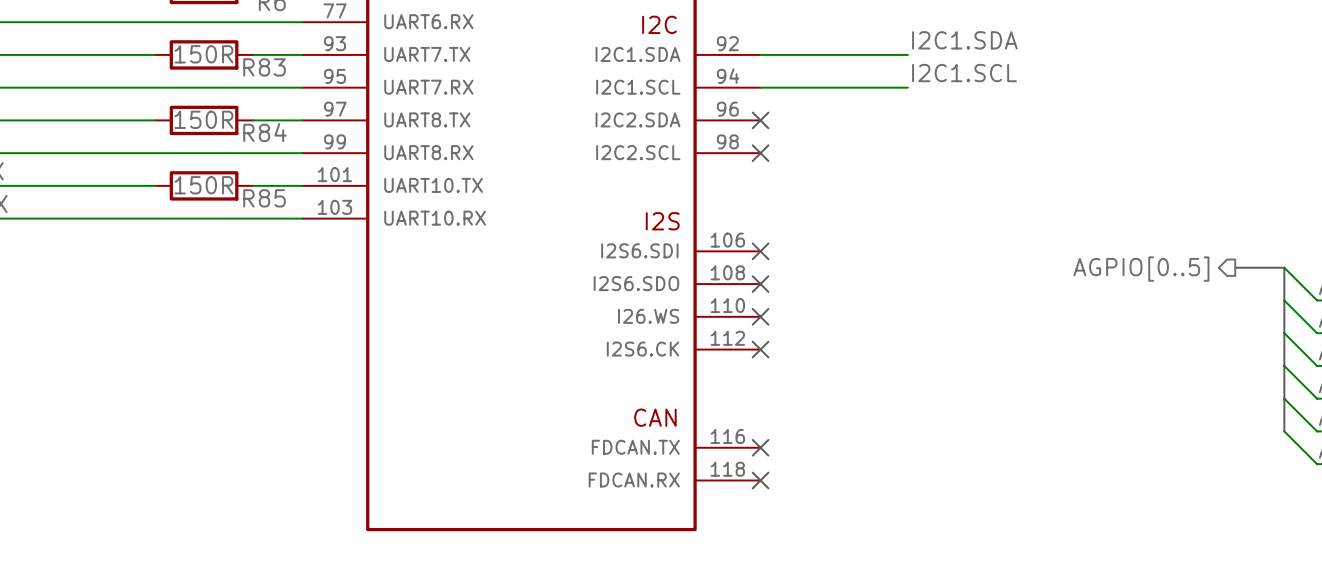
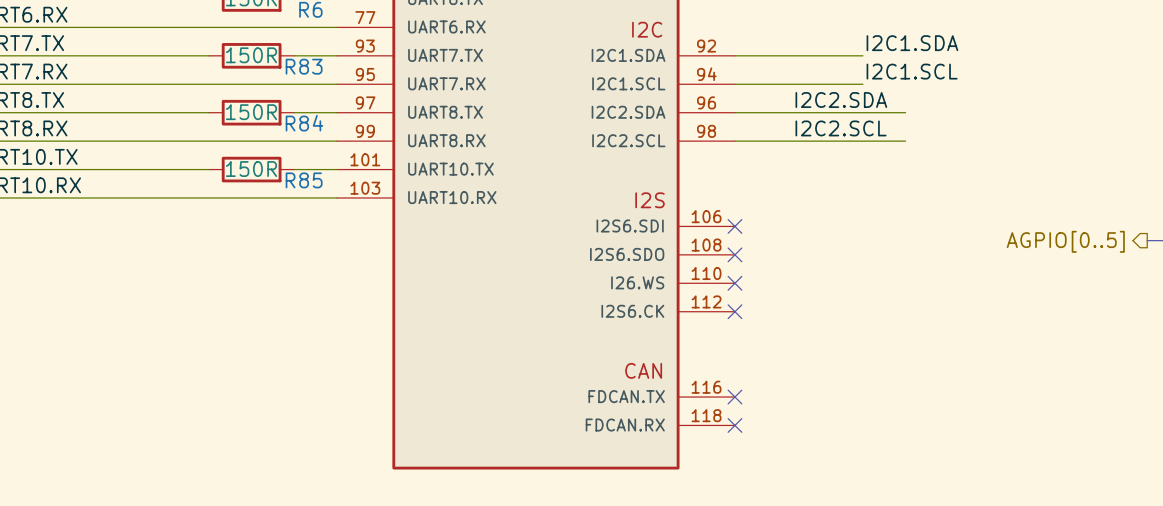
label: none -> I2C2.SDA (841, 100)
wire: none -> (734, 112) (905, 112)
no-connect mark: (760, 120) -> none
label: none -> I2C2.SCL (841, 128)
wire: none -> (734, 141) (905, 141)
no-connect mark: (760, 153) -> none

